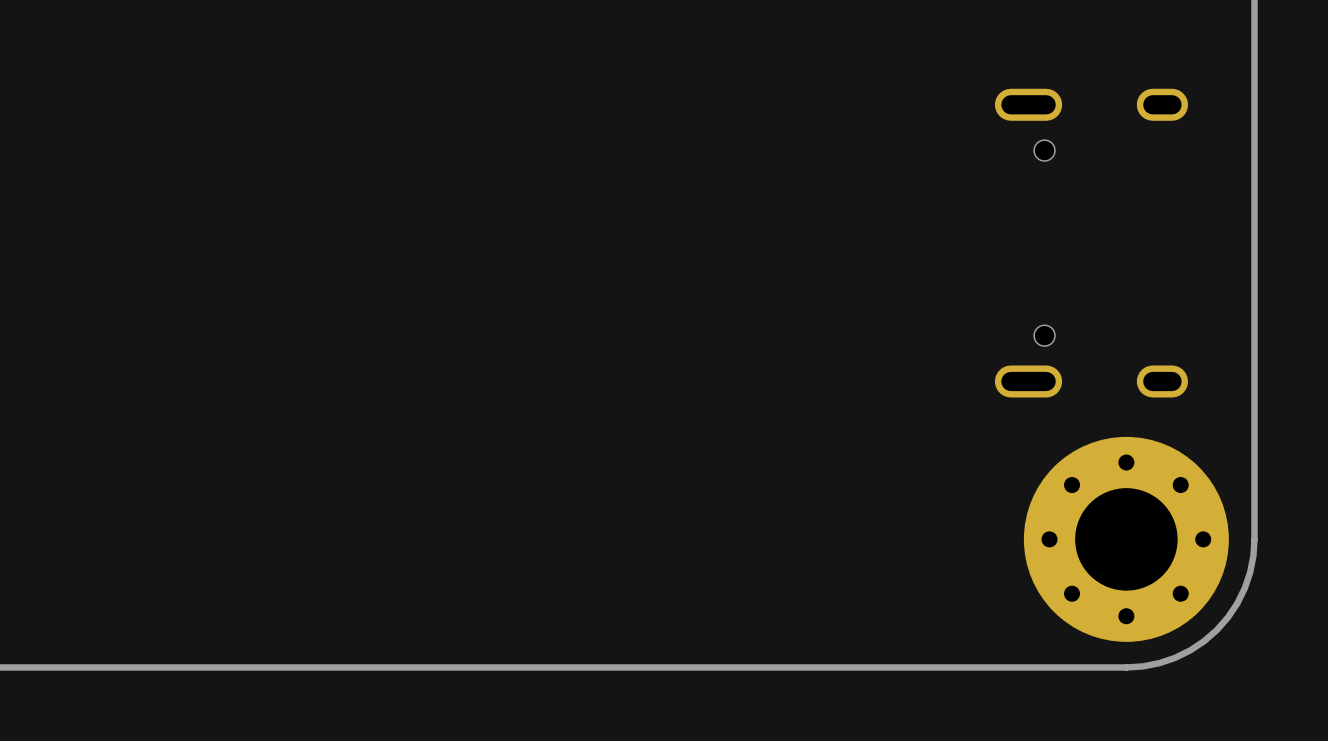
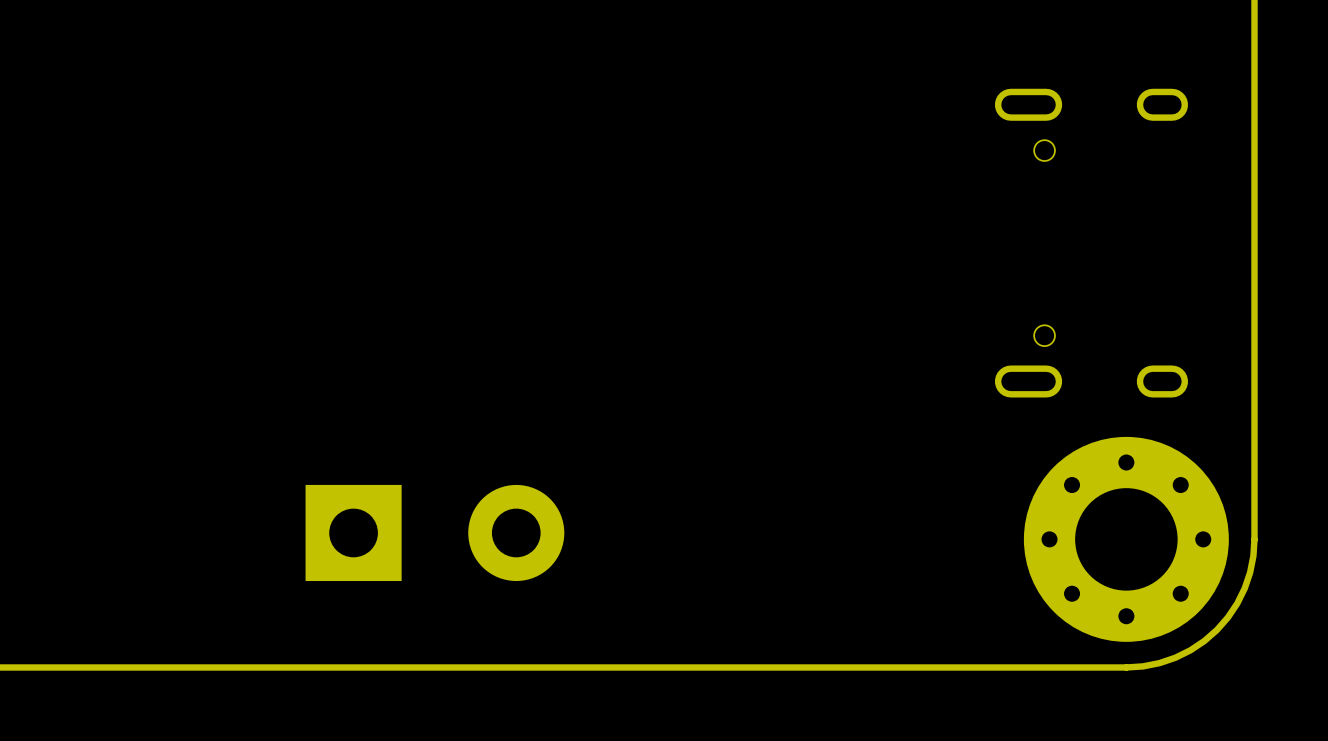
part: none -> (434, 532)

